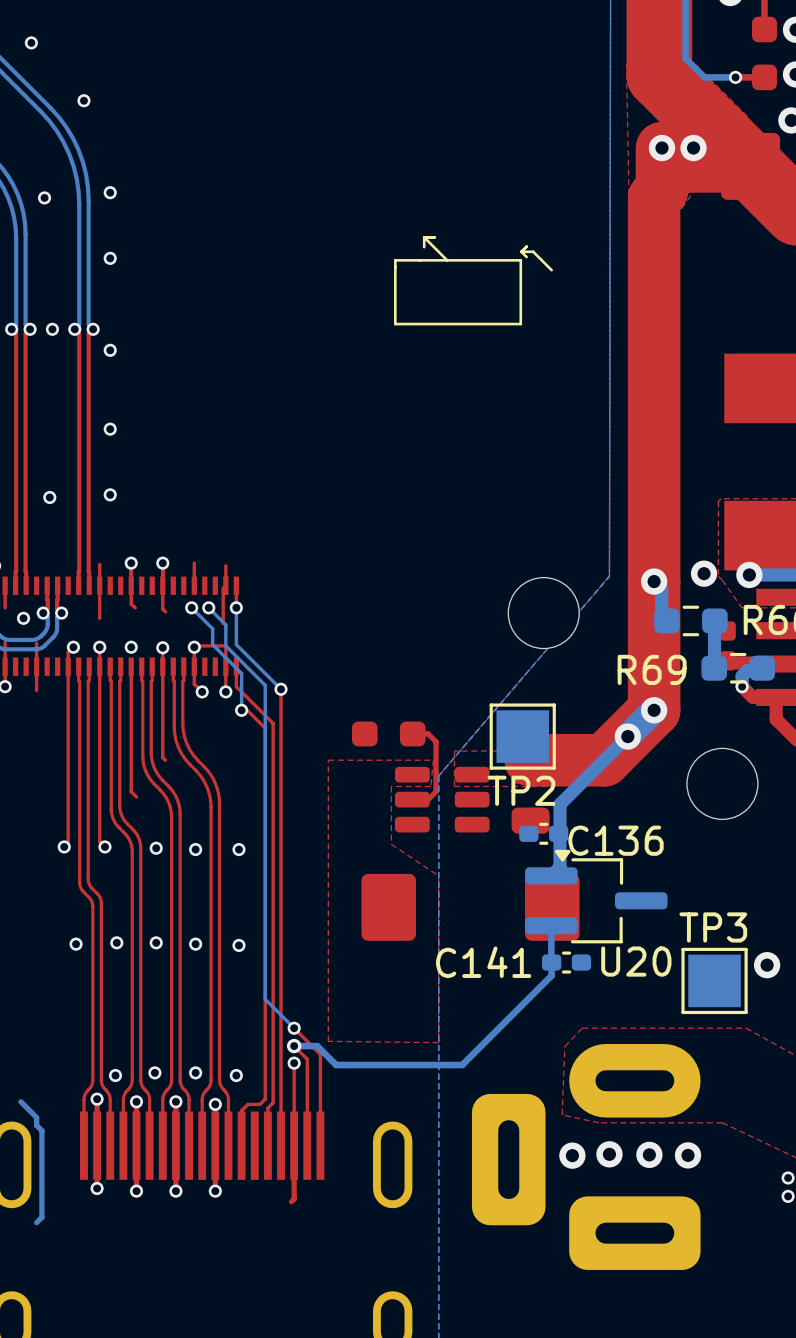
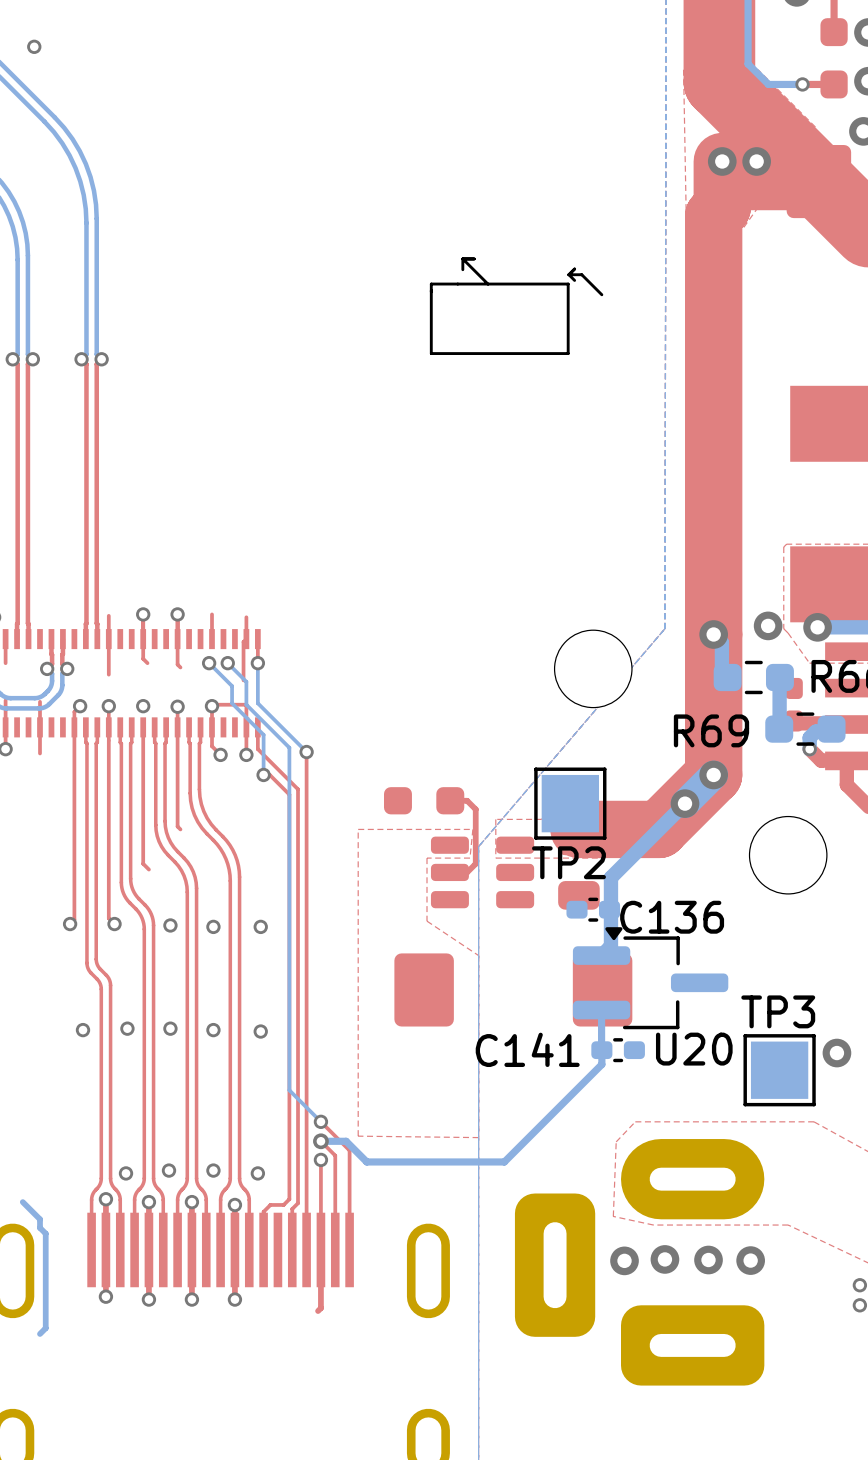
via: (83, 100) -> none
via: (110, 192) -> none
via: (44, 197) -> none
via: (110, 258) -> none
via: (52, 329) -> none
via: (110, 350) -> none
via: (110, 429) -> none
via: (110, 494) -> none
via: (49, 497) -> none
via: (23, 618) -> none

